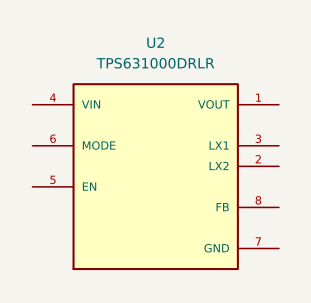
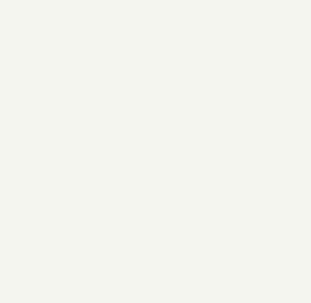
U2: TPS631000DRLR (155, 176) -> none

